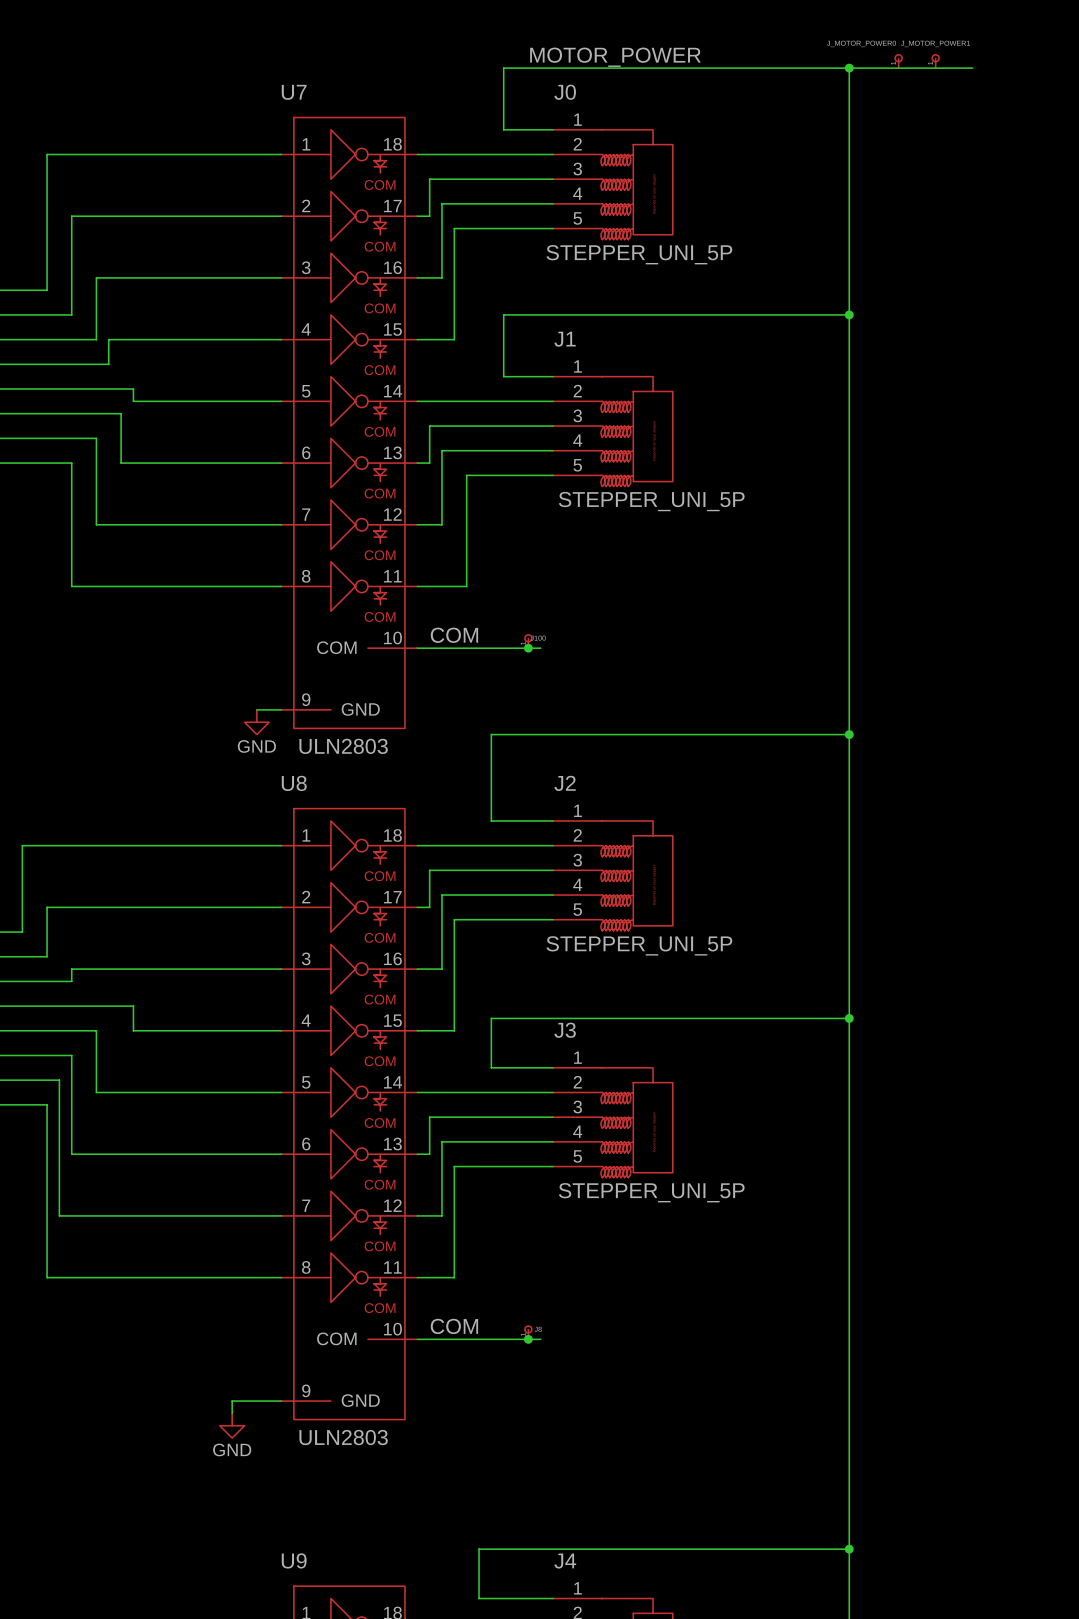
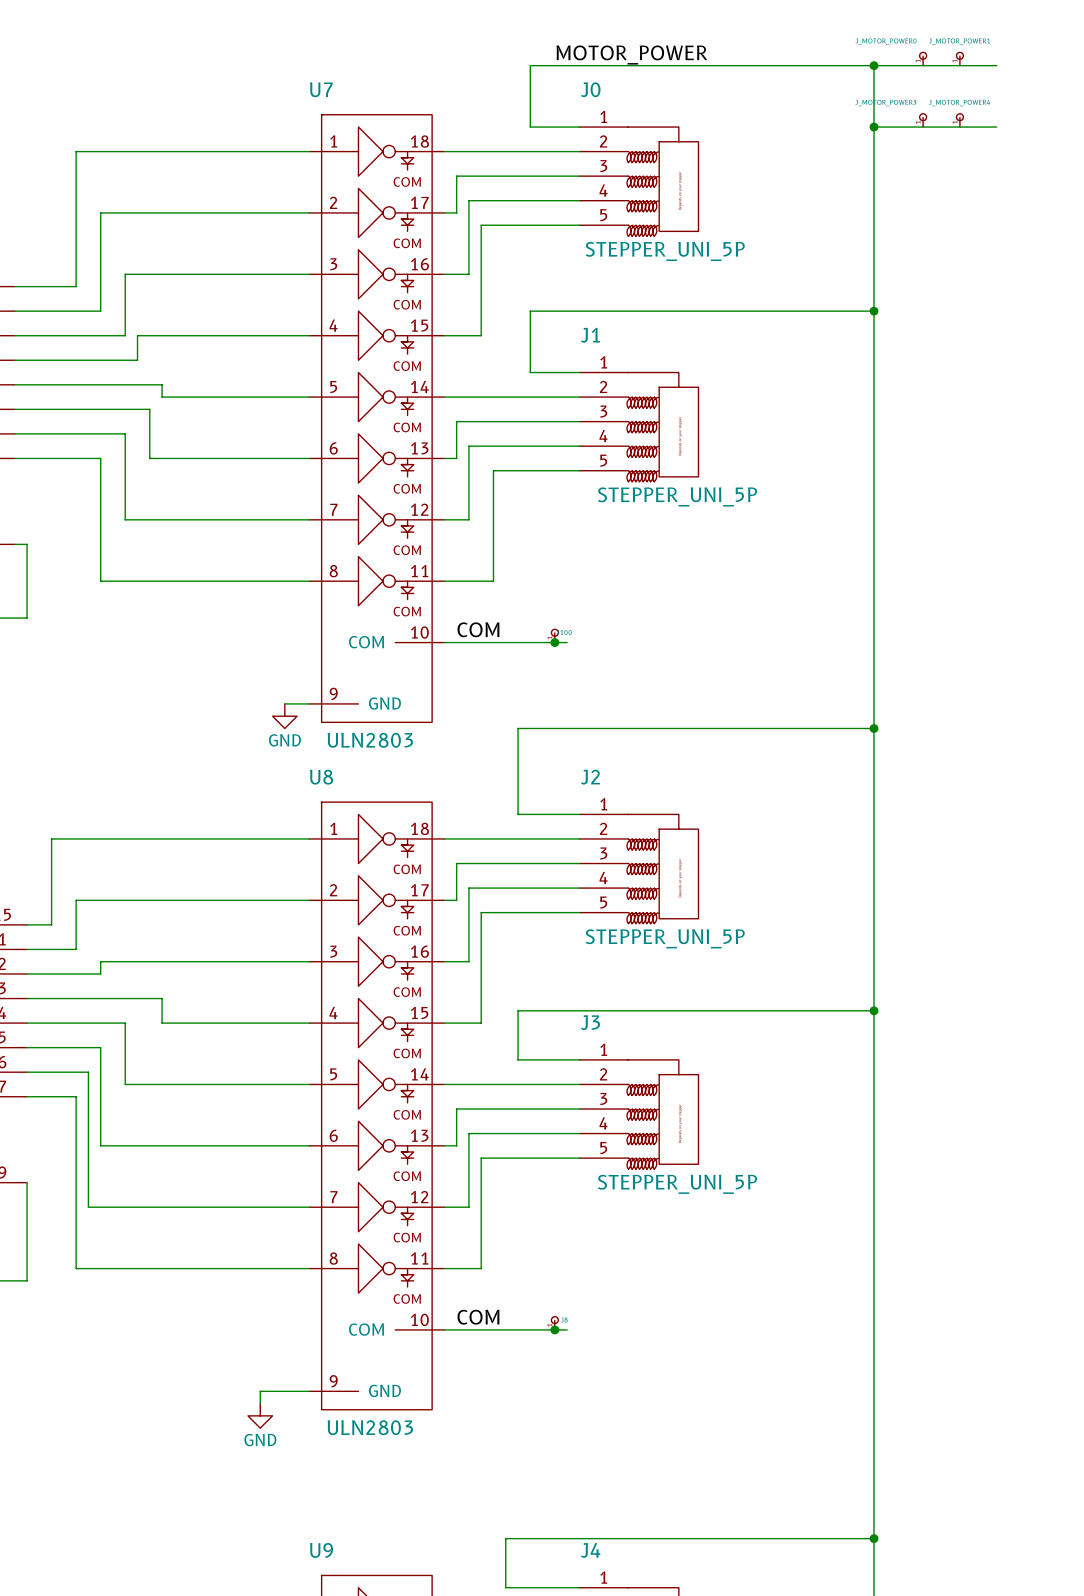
part: none -> (923, 120)
part: none -> (959, 120)
wire: none -> (874, 127) (996, 127)
junction: none -> (874, 127)

